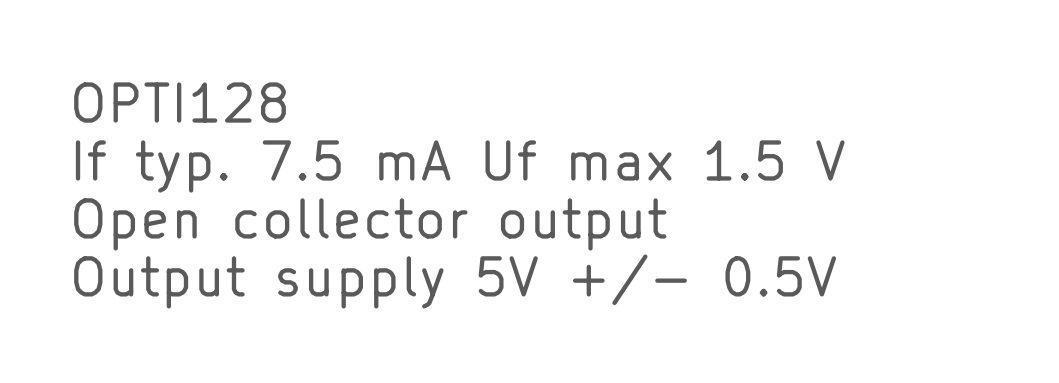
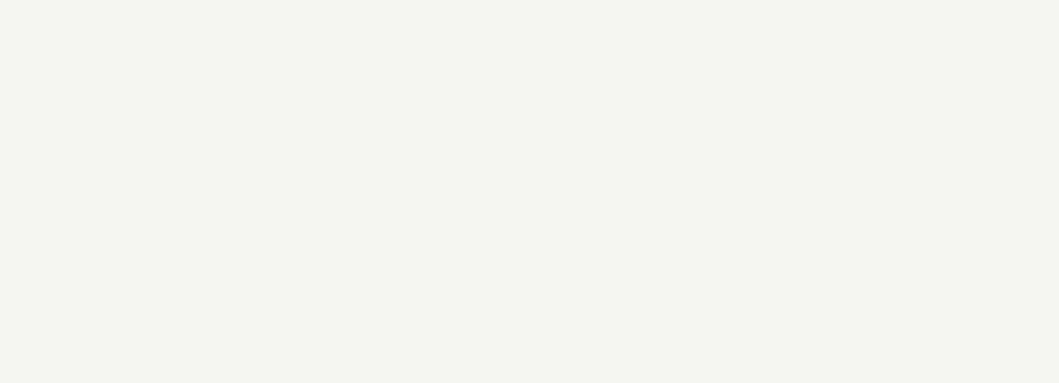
text: OPTI128 (180, 102) -> none
text: If typ. 7.5 mA Uf max 1.5 V (460, 166) -> none
text: Open collector output (370, 224) -> none
text: Output supply 5V +/- 0.5V (455, 281) -> none

